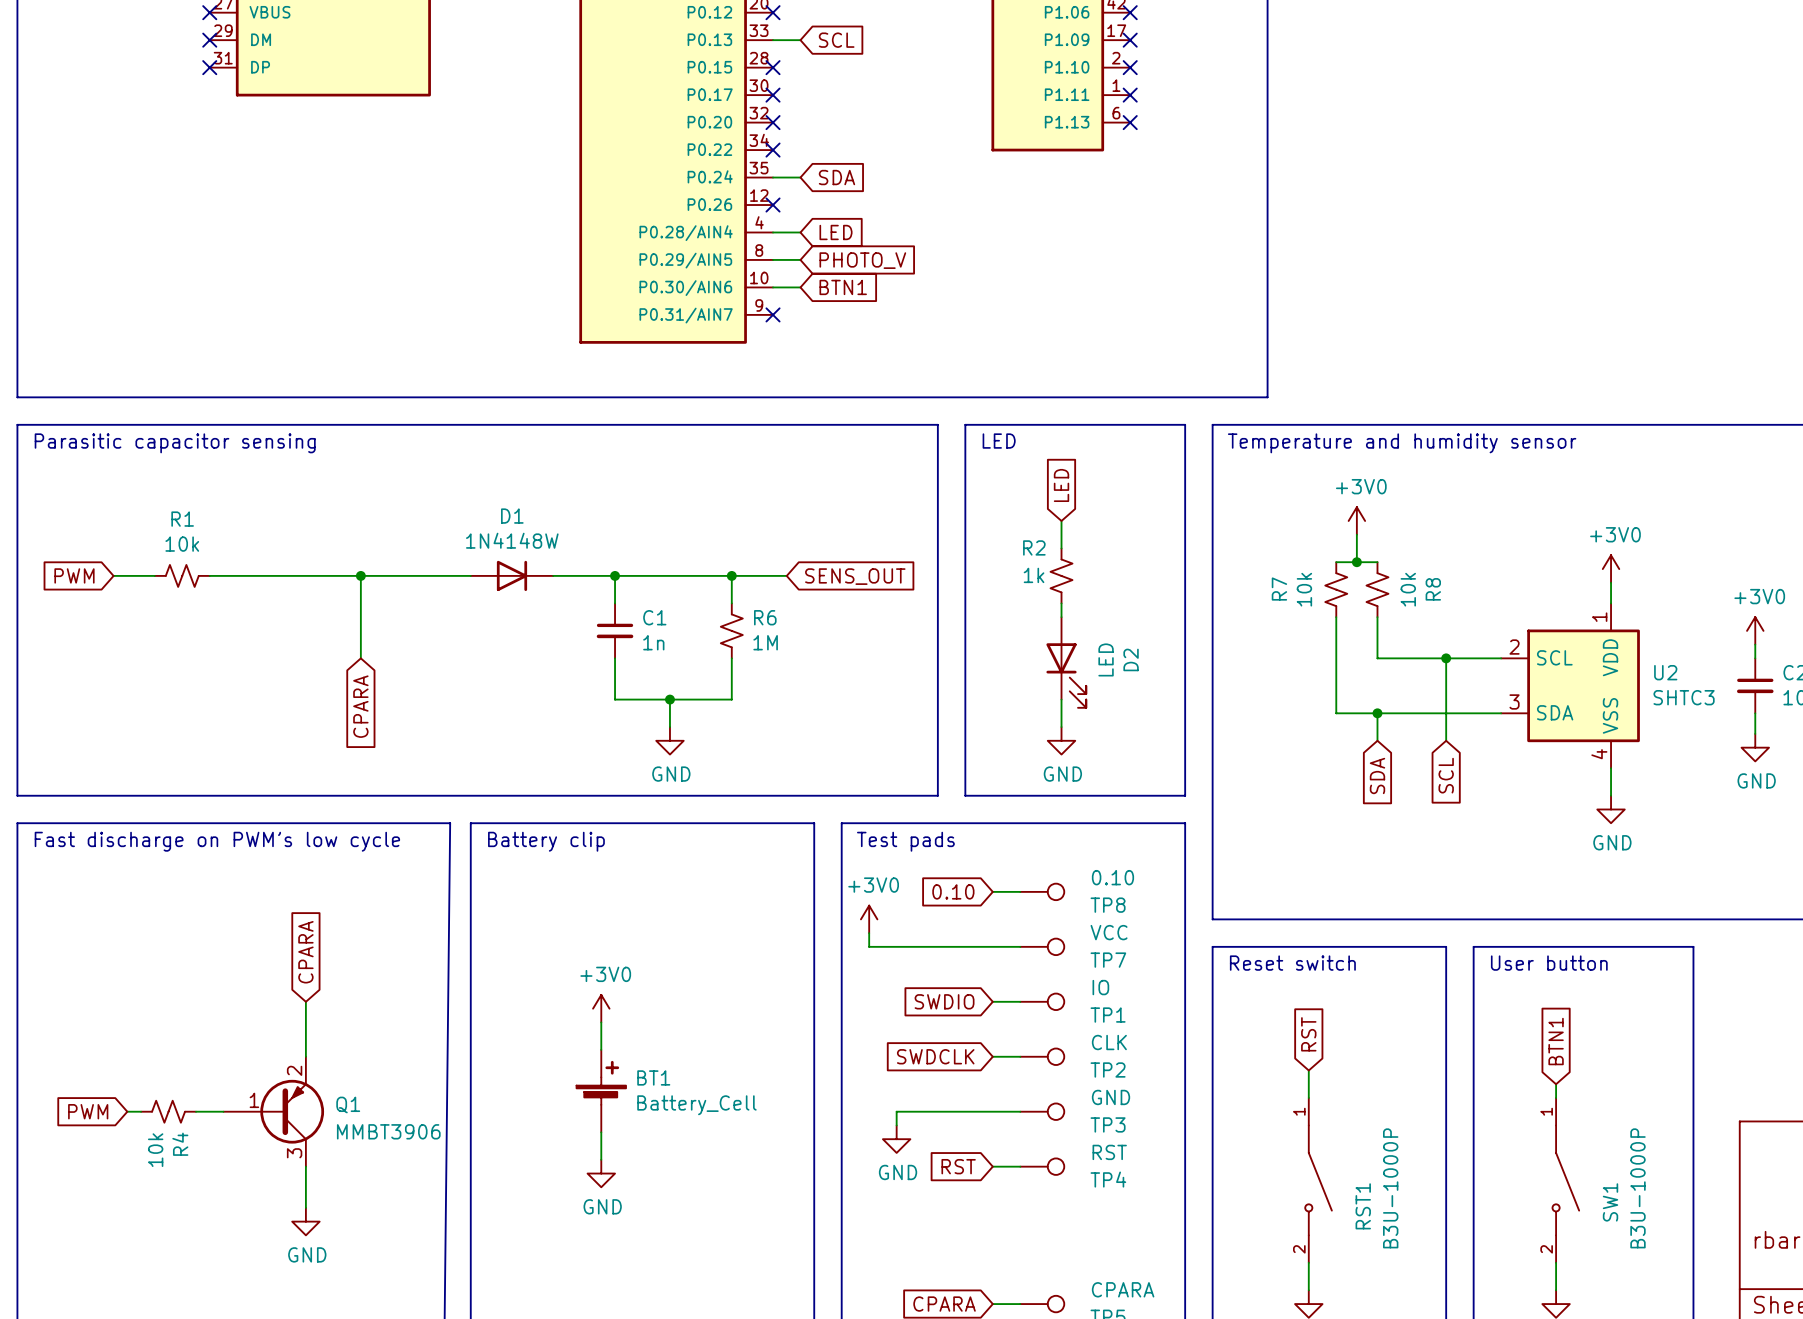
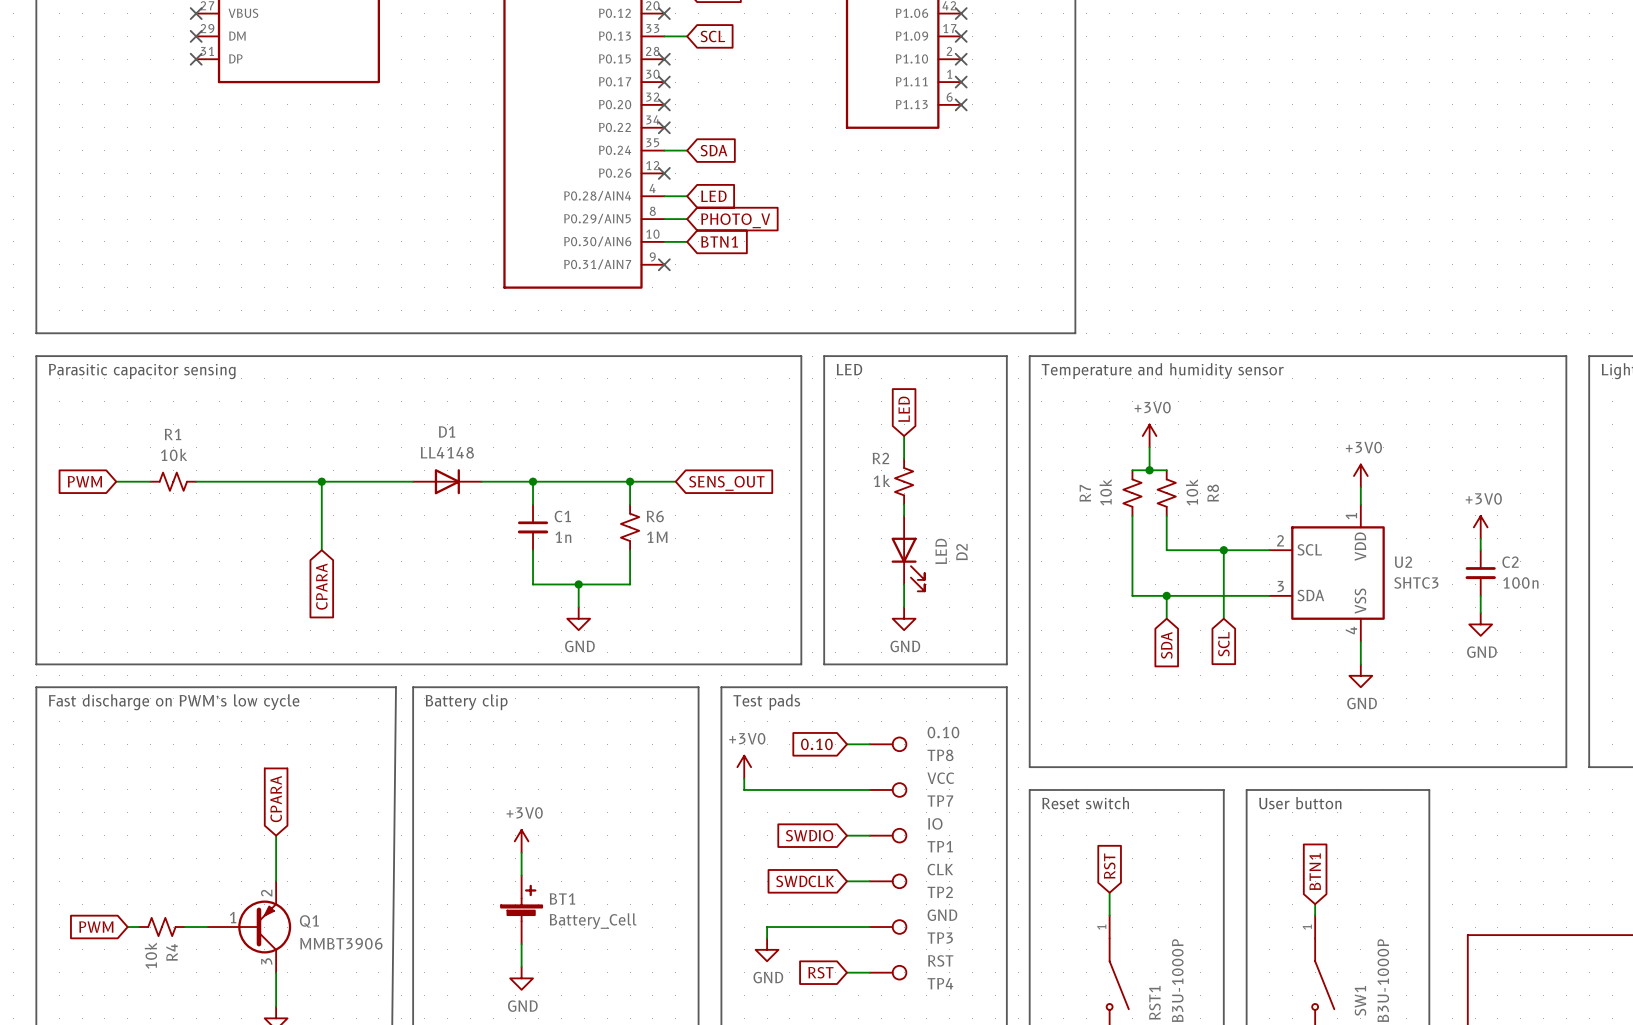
D1 value: 1N4148W (512, 540) -> LL4148 (447, 452)

